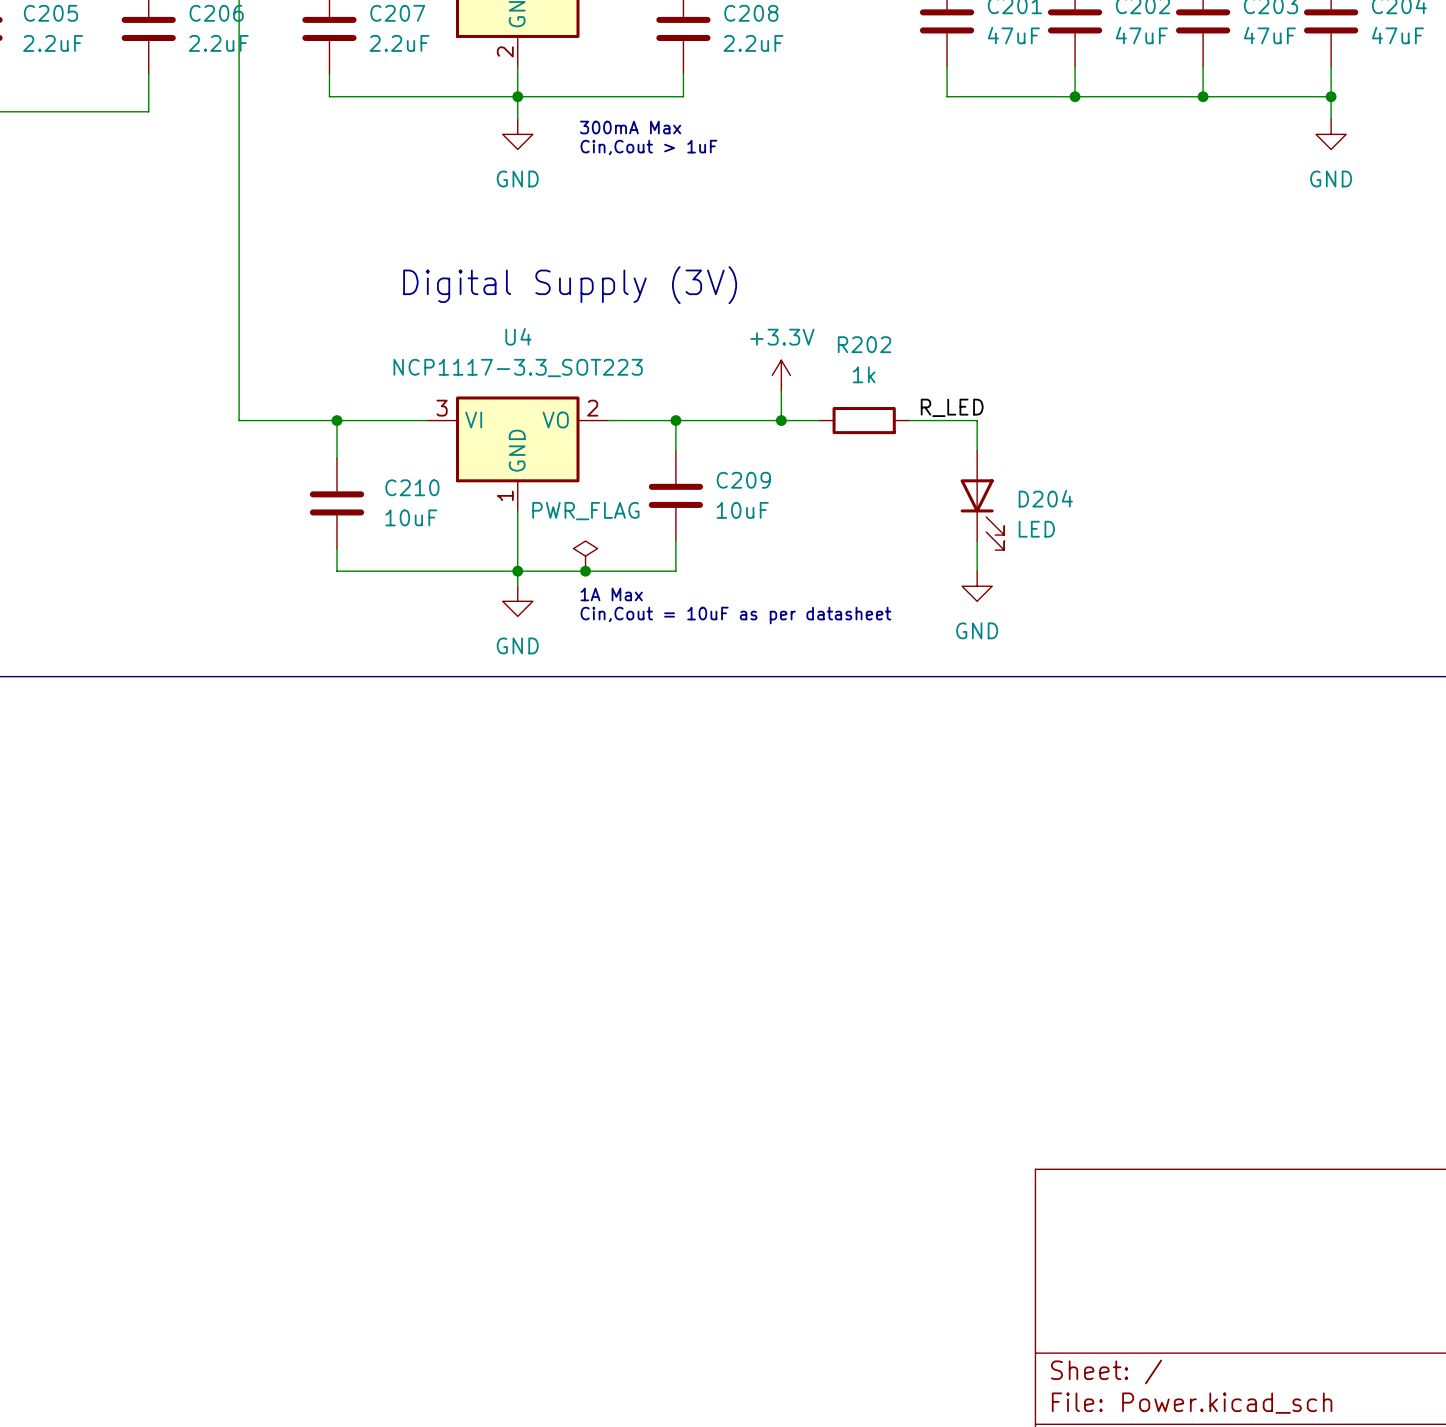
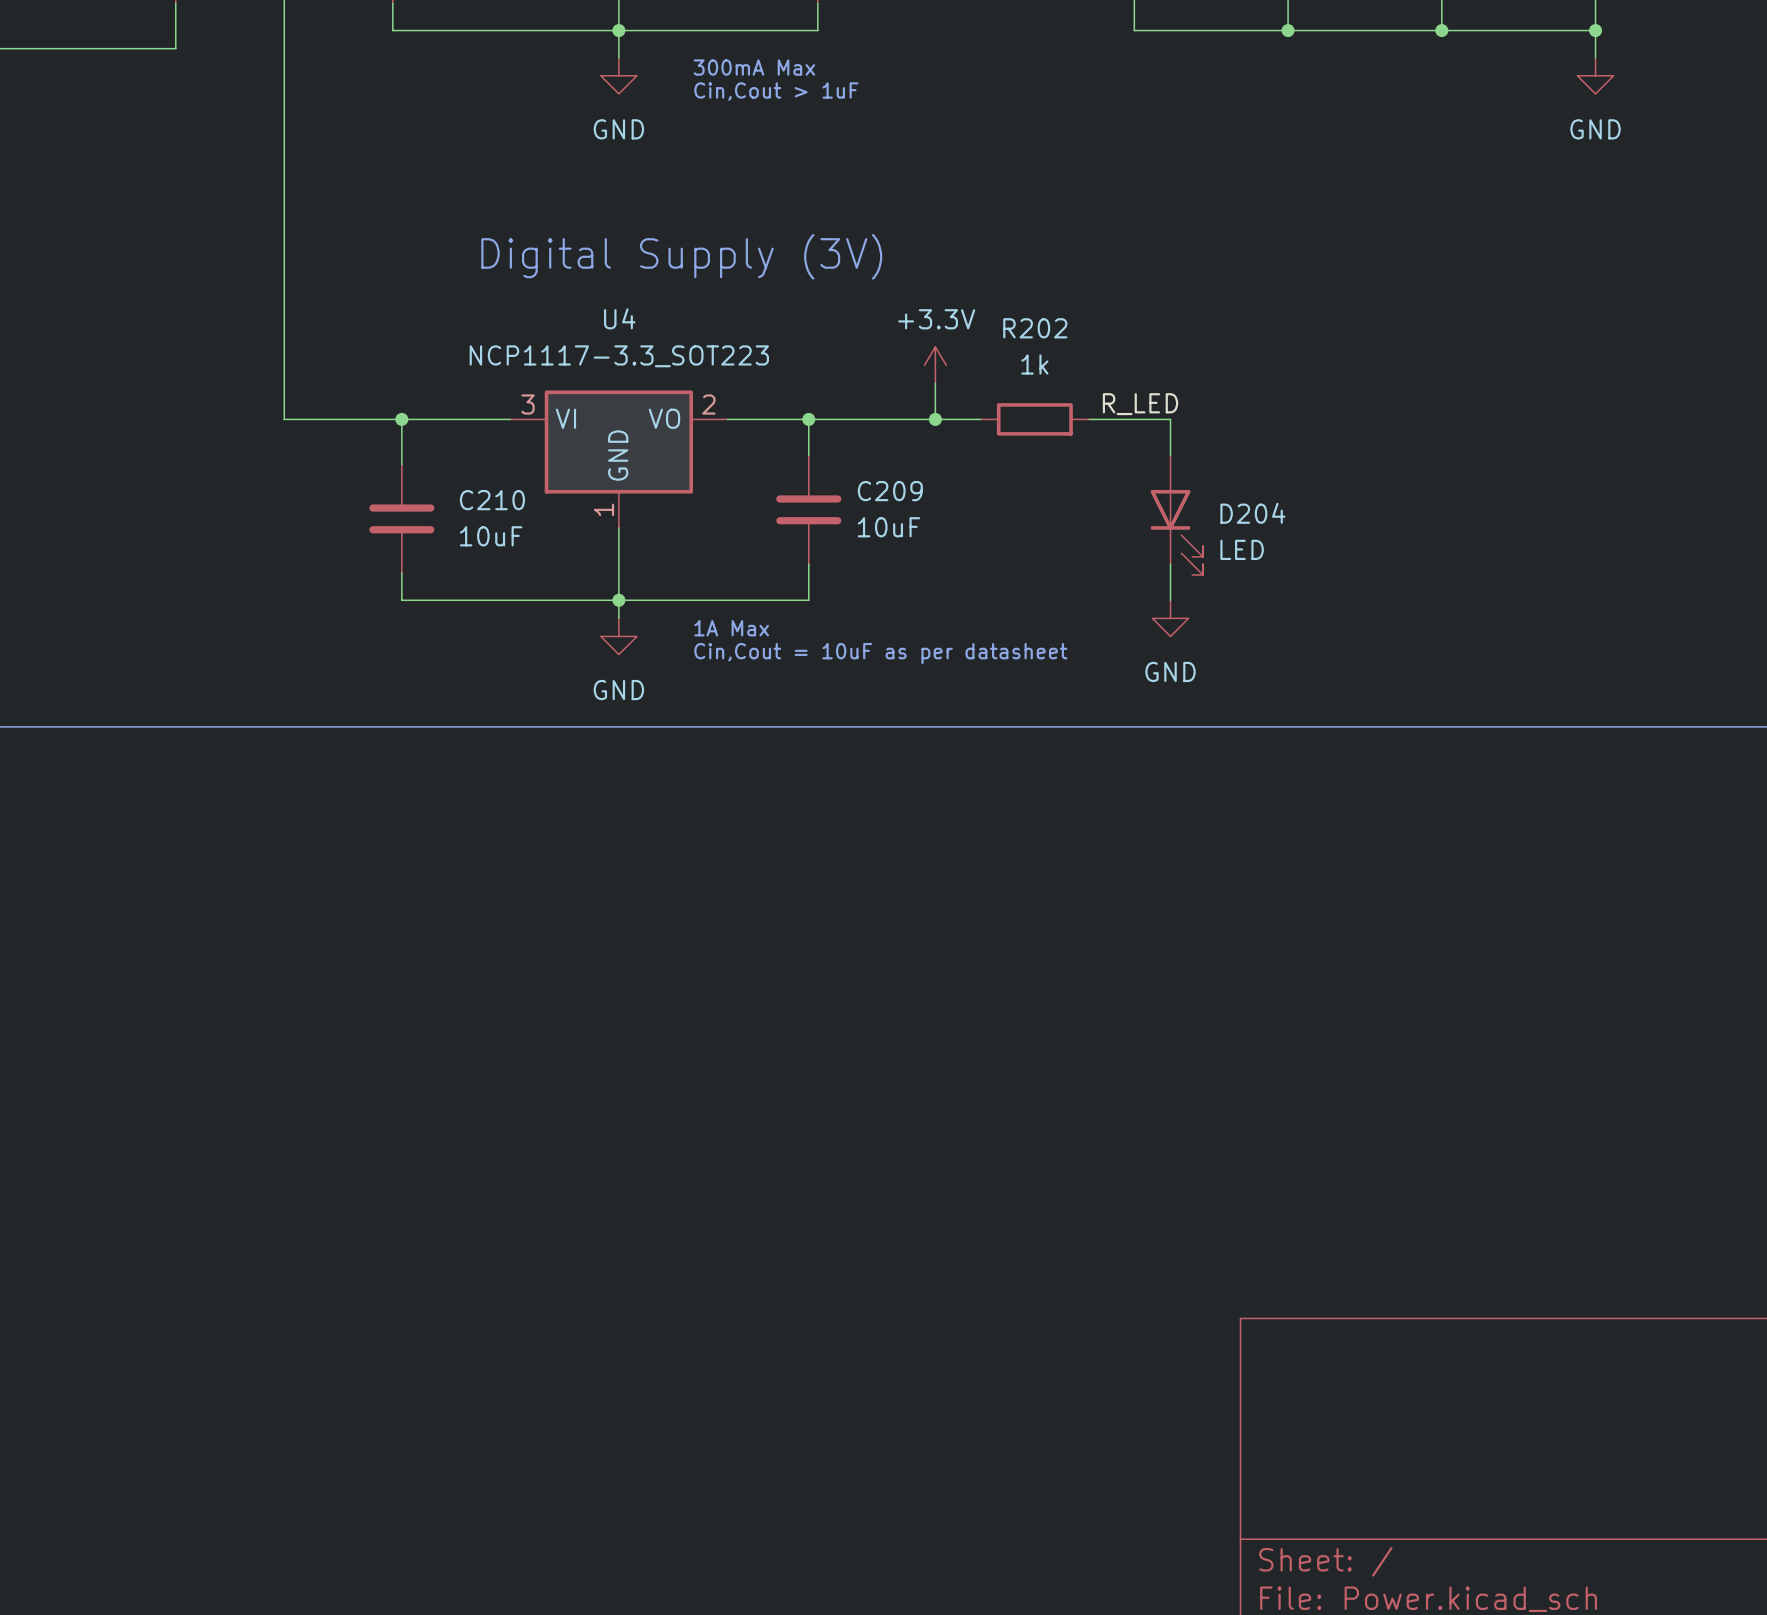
power symbol: PWR_FLAG (585, 556) -> none
junction: (585, 571) -> none

